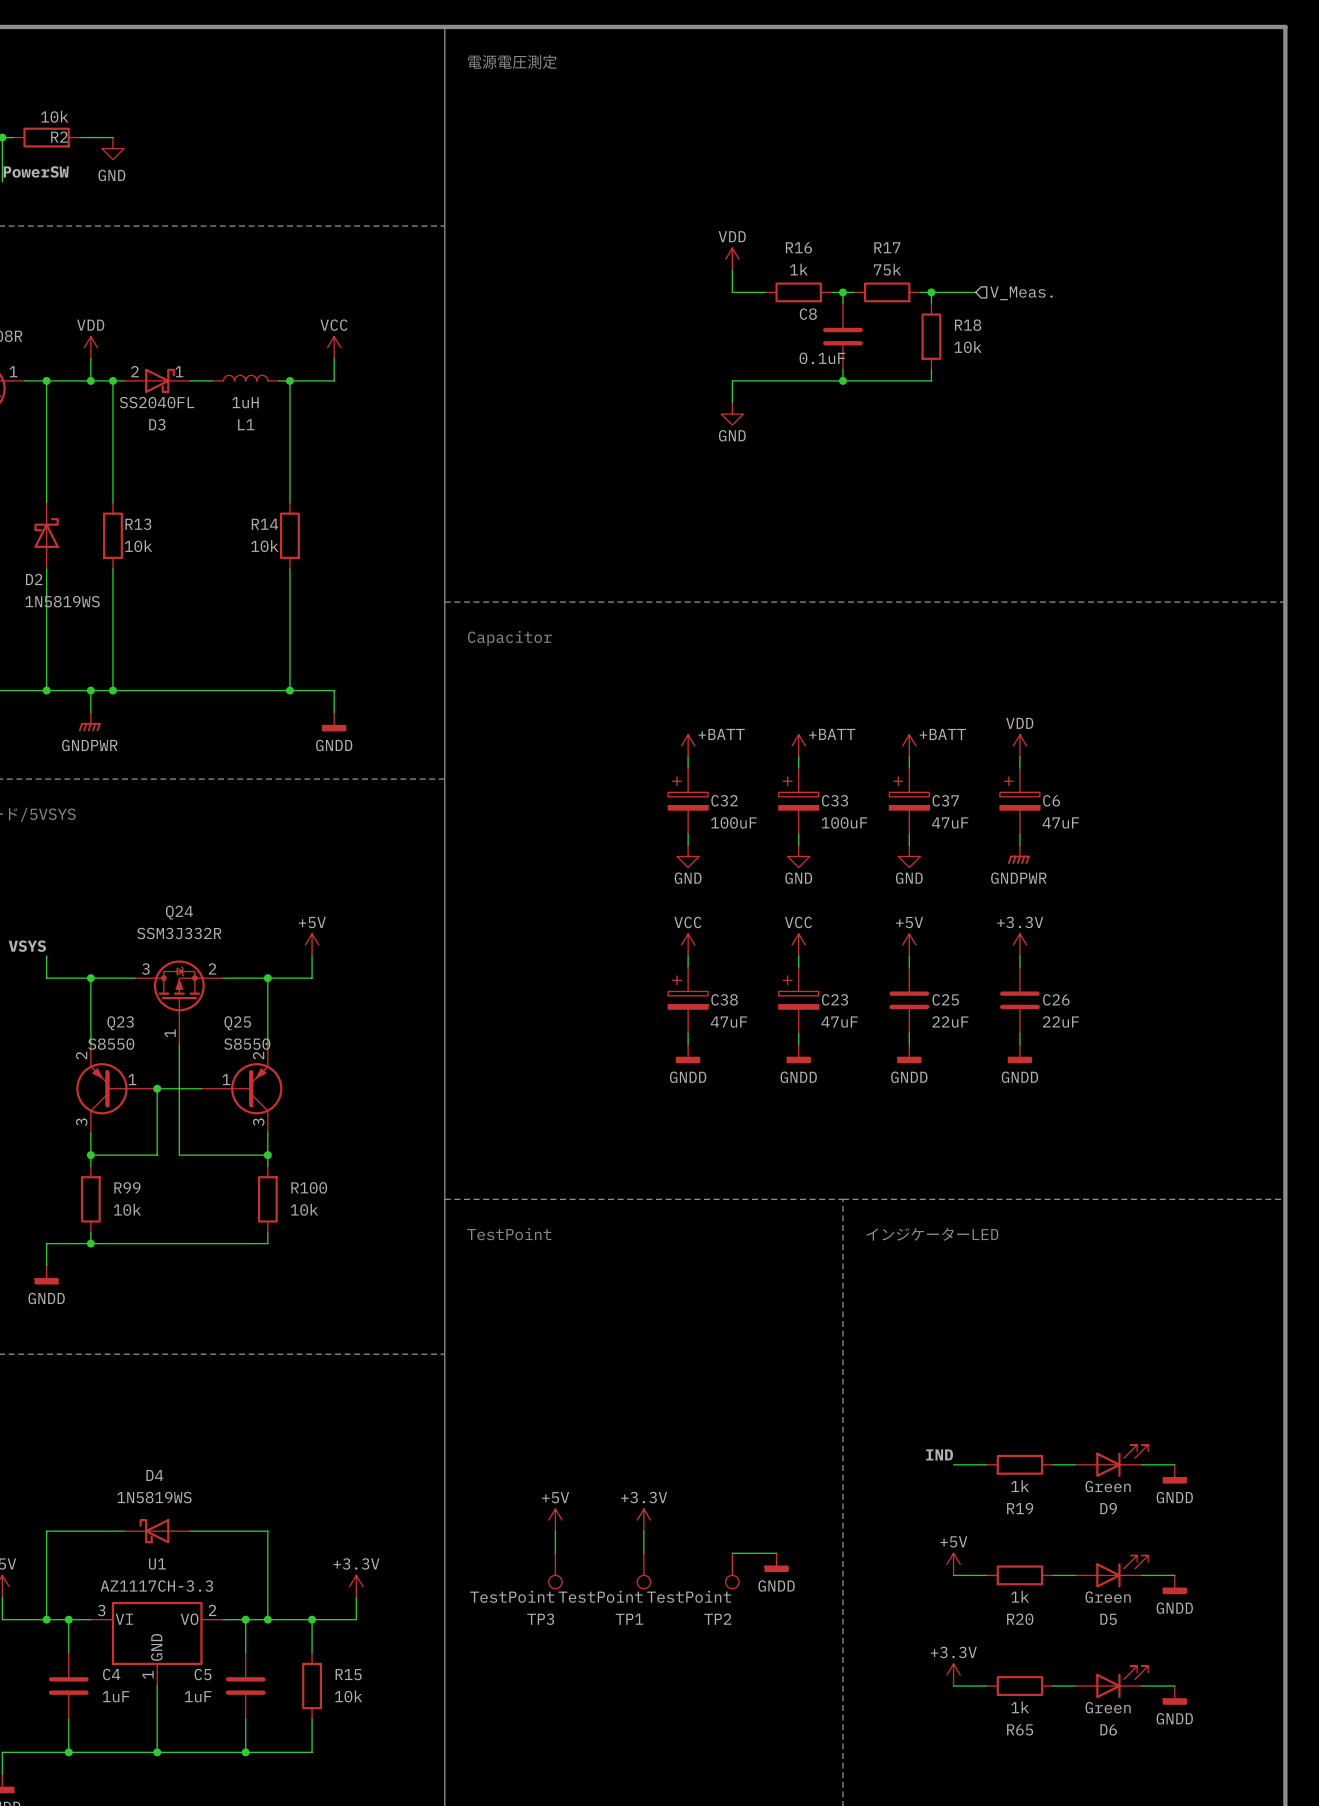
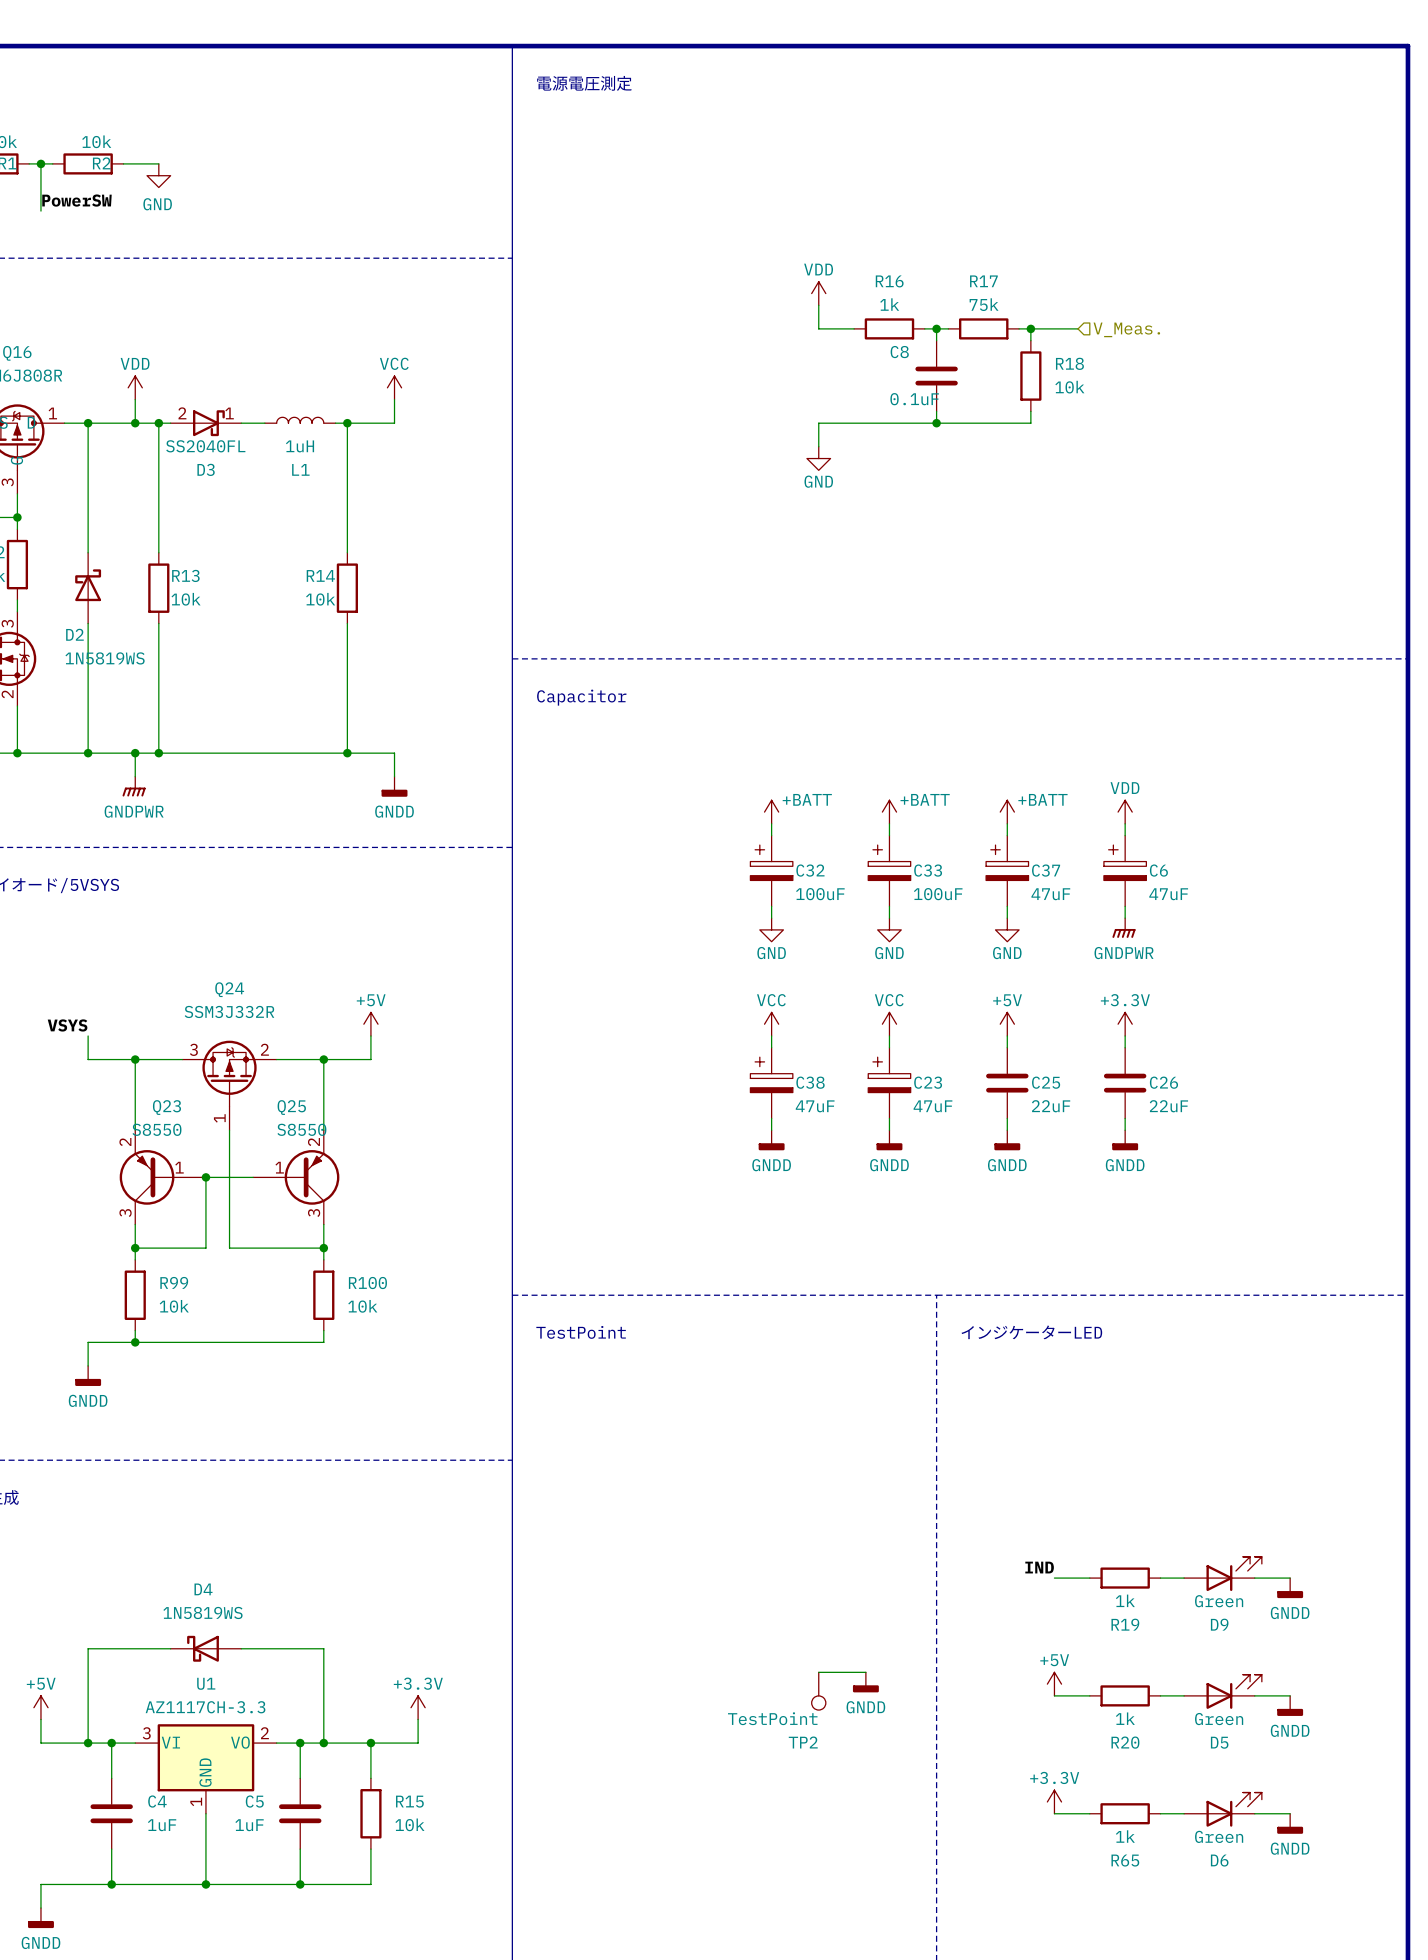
power symbol: +5V (555, 1520) -> none
power symbol: +3.3V (643, 1520) -> none
wire: (555, 1531) (555, 1553) -> none
wire: (643, 1531) (643, 1553) -> none
TP3: TestPoint (555, 1570) -> none
TP1: TestPoint (643, 1570) -> none

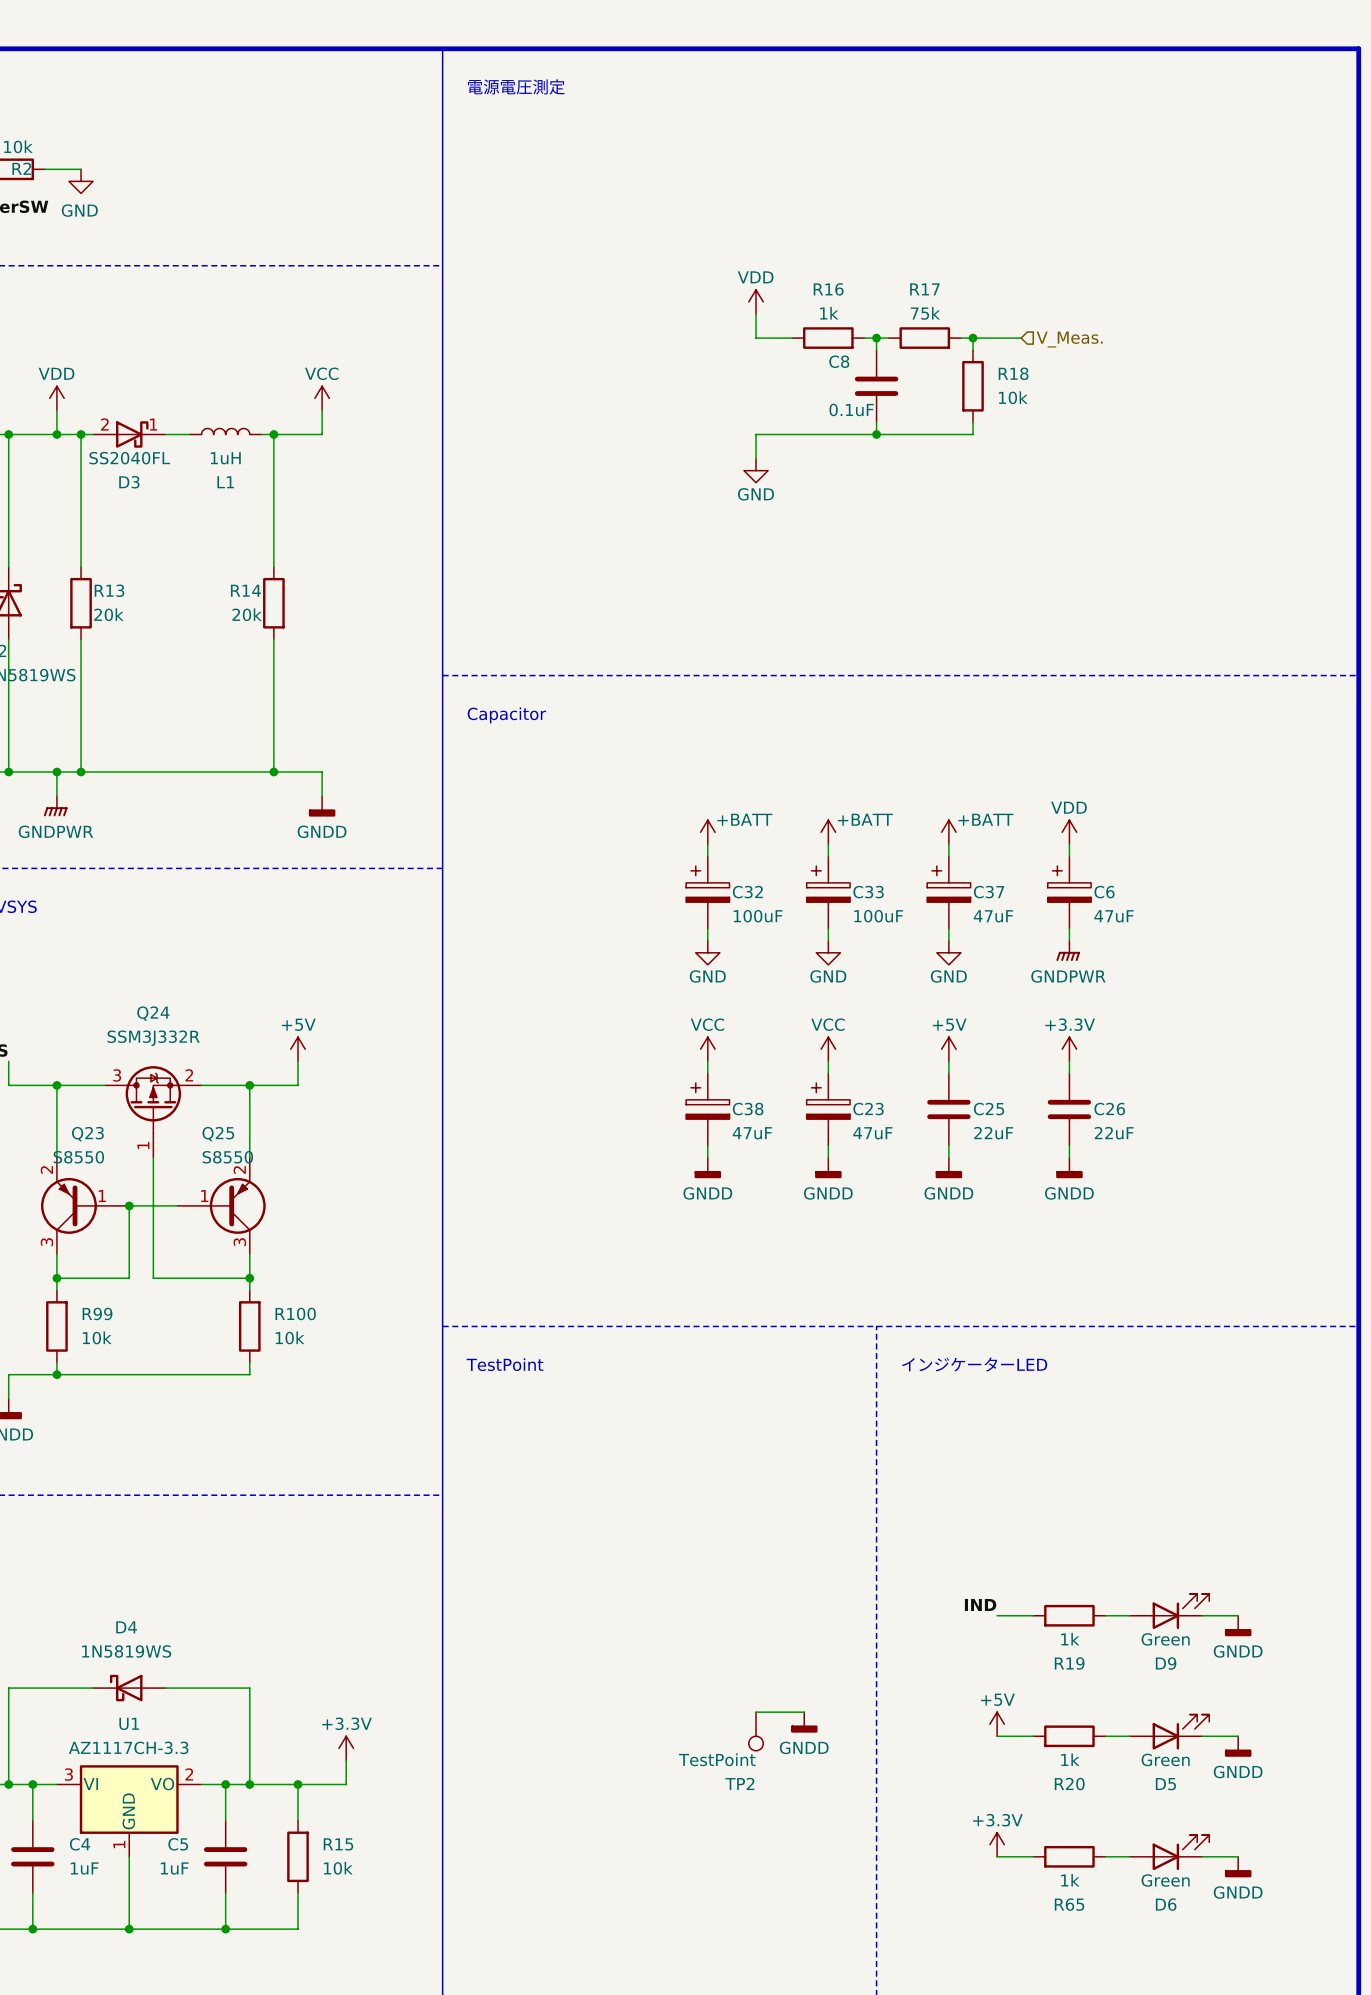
R13 value: 10k (186, 599) -> 20k (108, 614)
R14 value: 10k (320, 599) -> 20k (247, 614)

